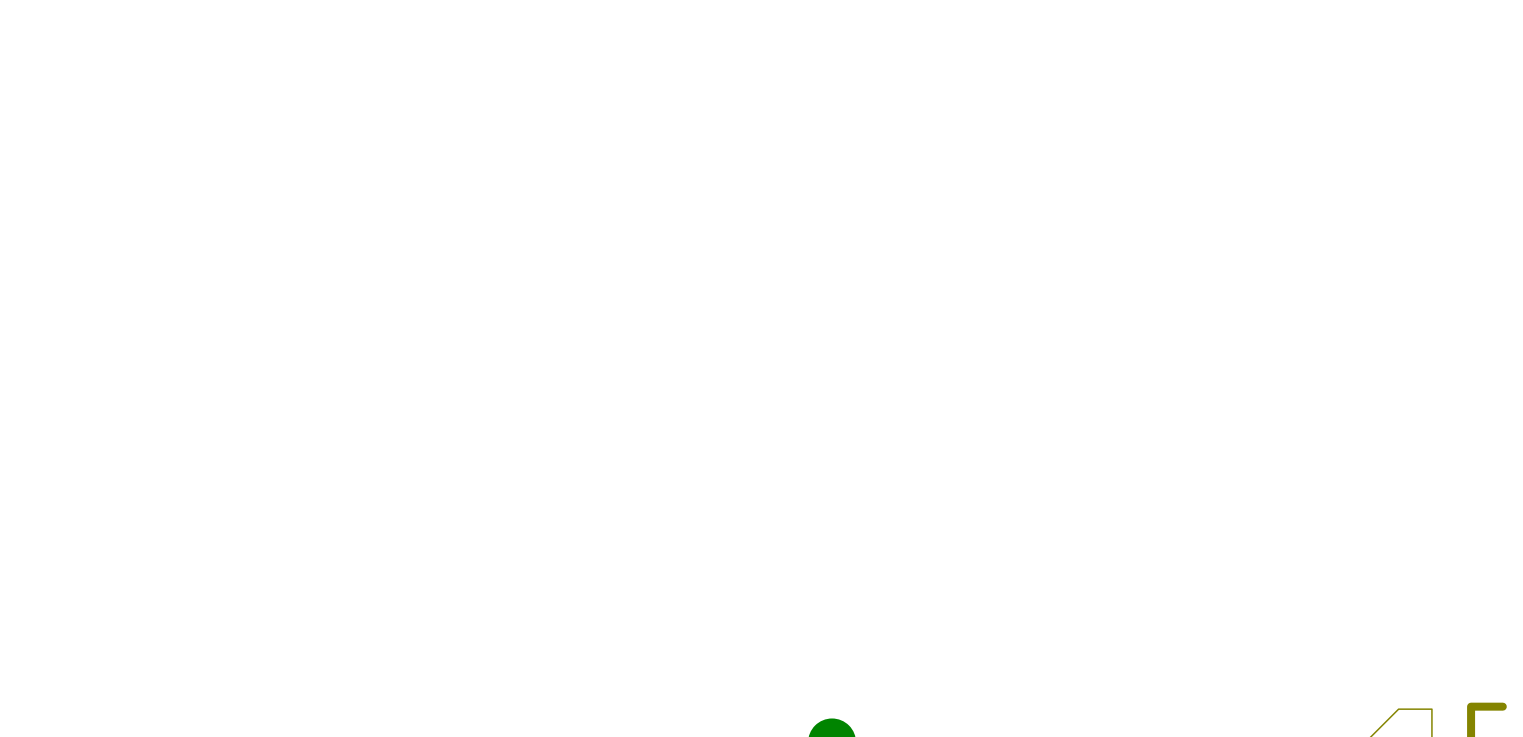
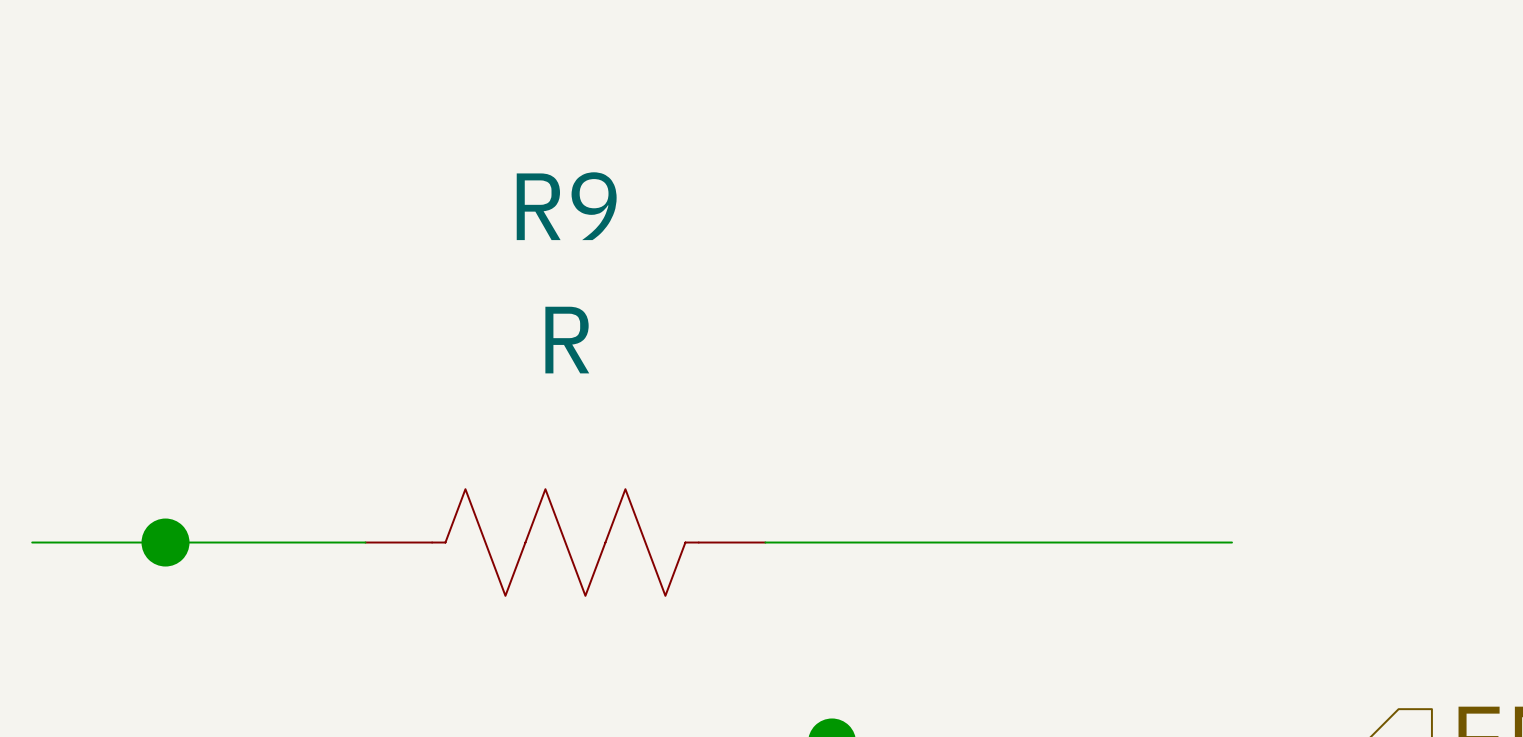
wire: none -> (32, 542) (365, 542)
junction: none -> (165, 542)
R9: none -> R (565, 542)
wire: none -> (765, 542) (1231, 542)

